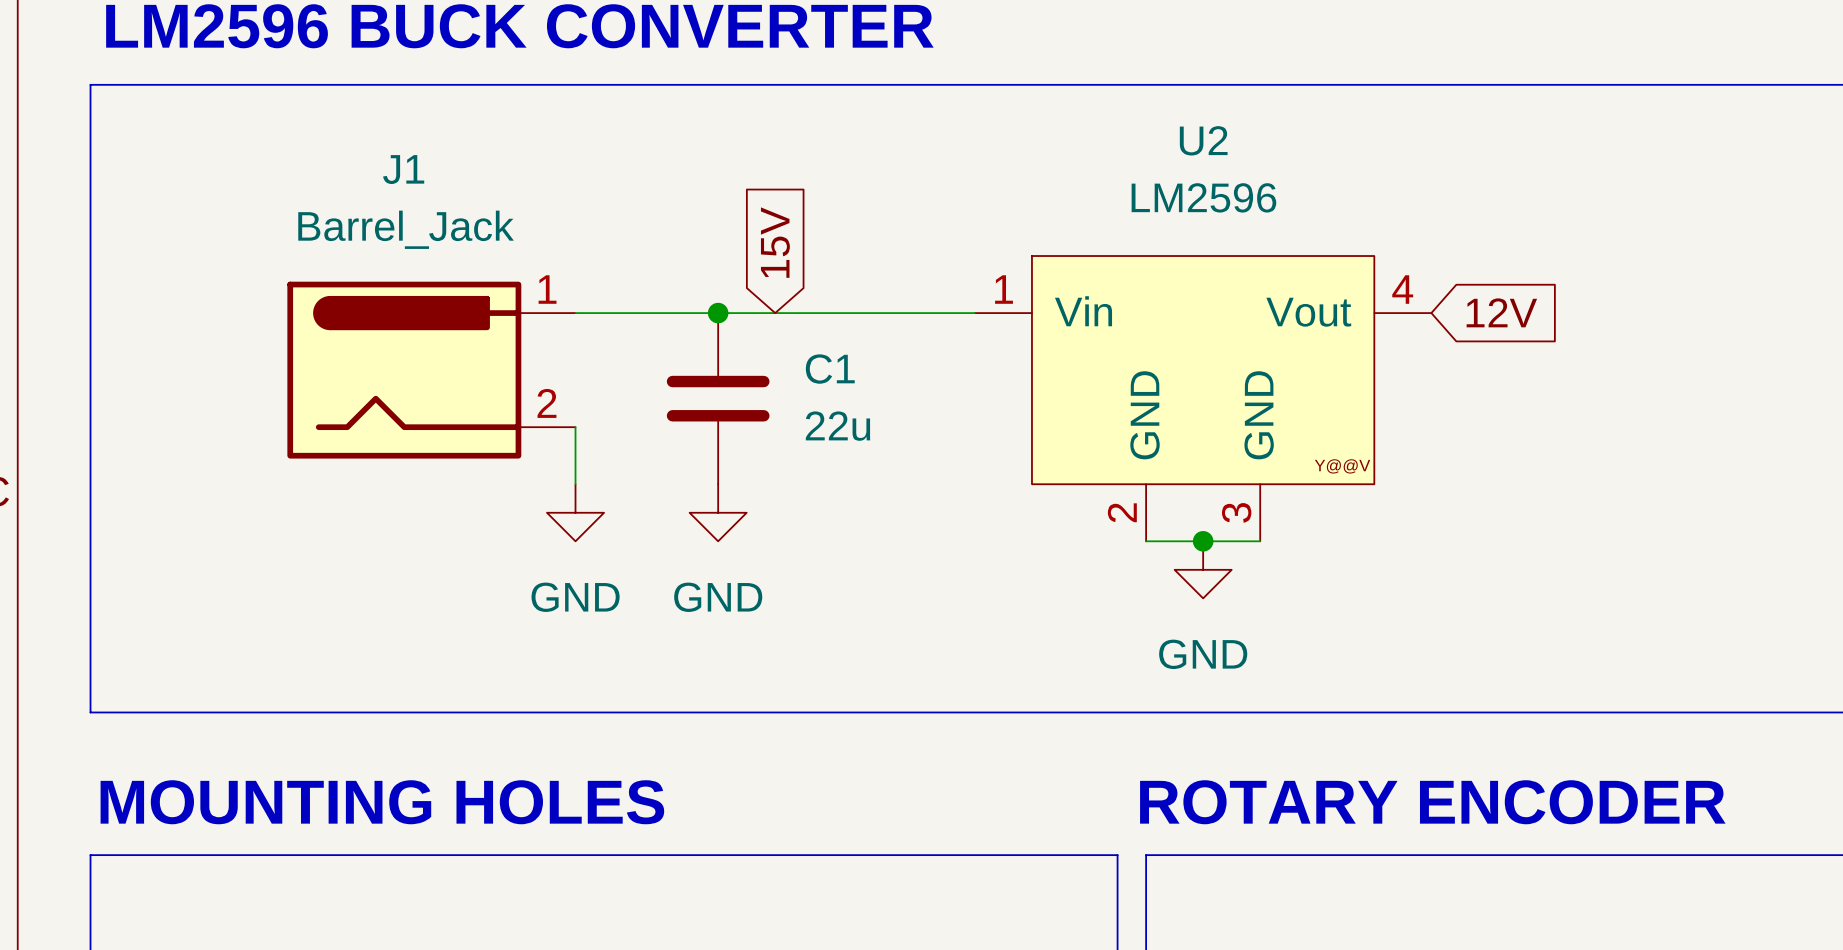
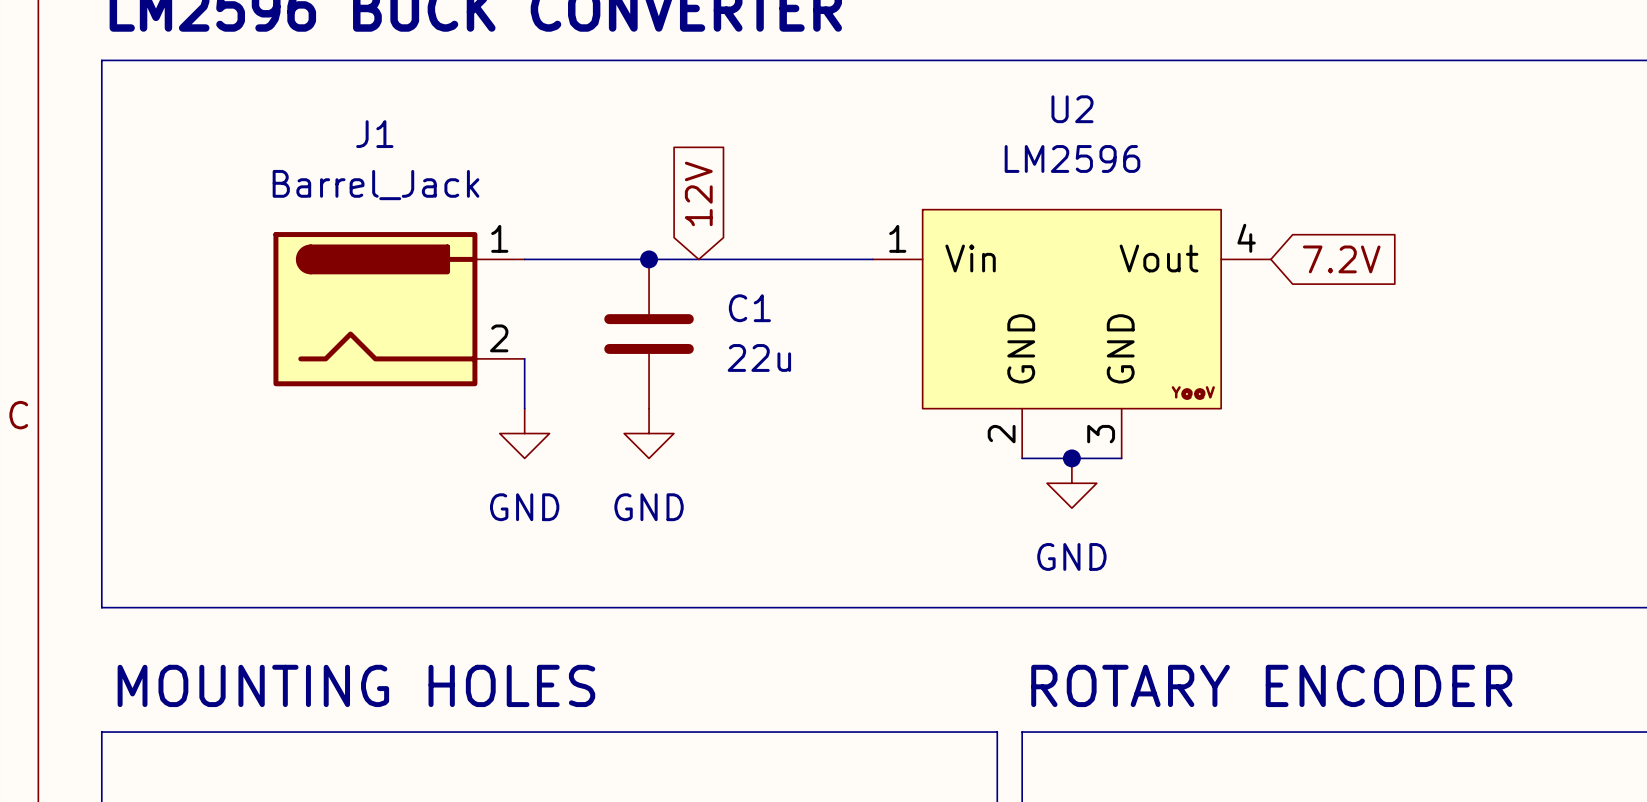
global label: 15V (775, 242) -> 12V (698, 193)
global label: 12V (1501, 312) -> 7.2V (1341, 259)

